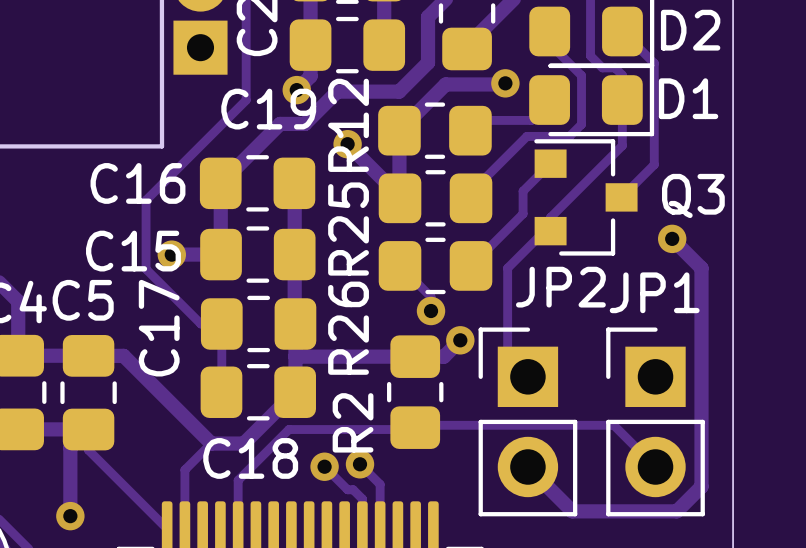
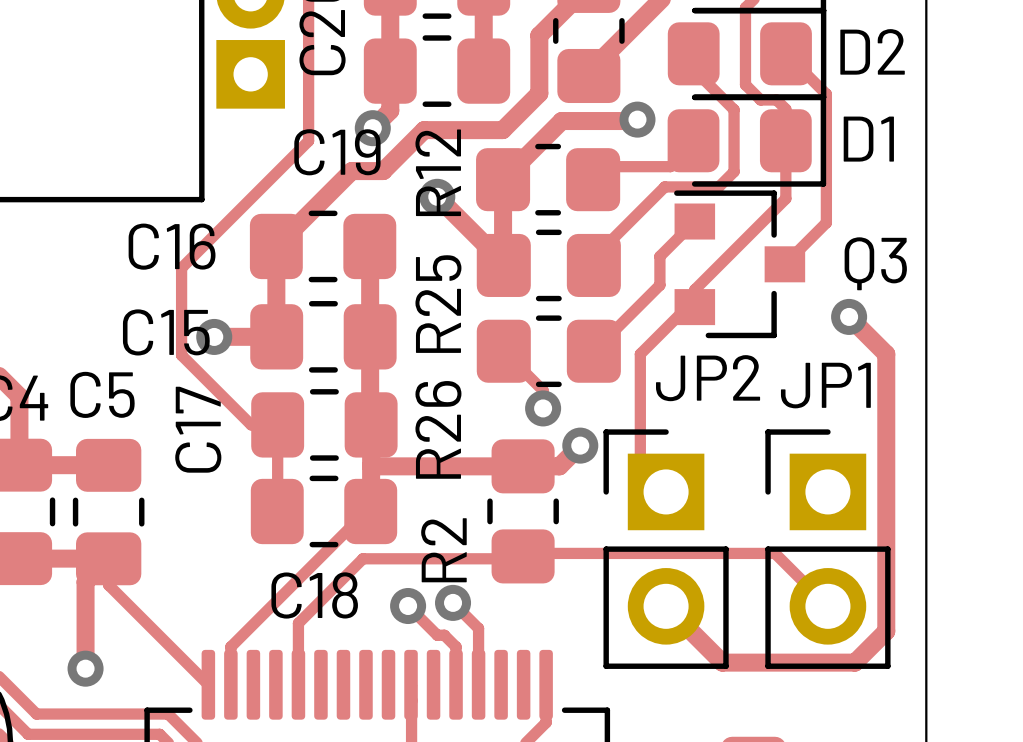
track: (88, 355) (123, 355) (211, 443) -> none
track: (295, 392) (243, 443) (211, 443) -> none
track: (211, 443) (184, 469) (184, 498) -> (366, 511) (230, 646)

